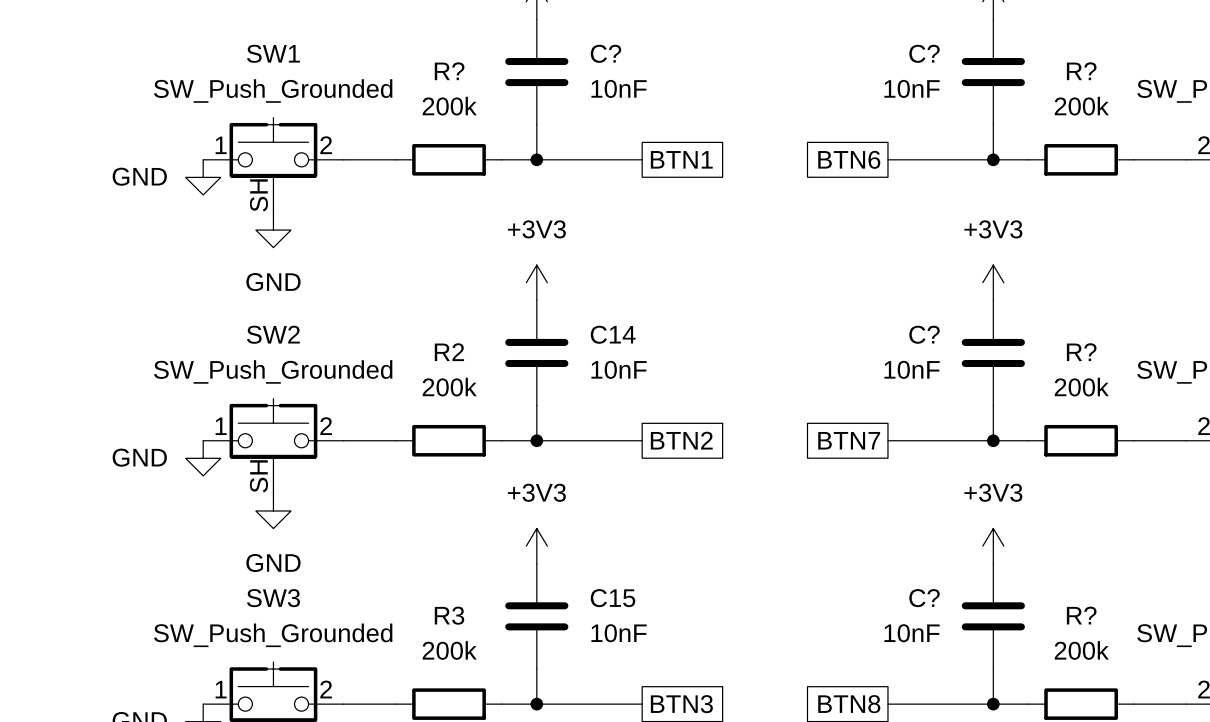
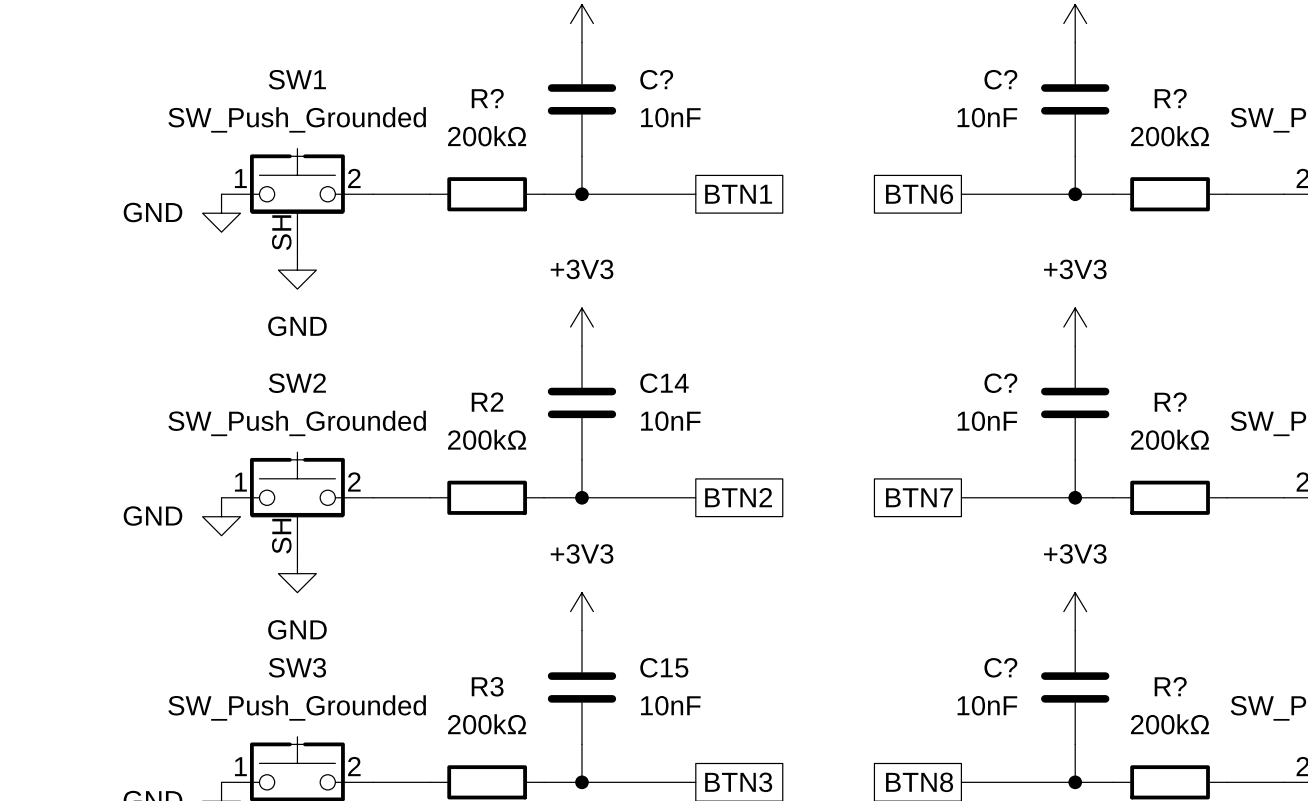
R? value: 200k (449, 106) -> 200kΩ (487, 136)
R? value: 200k (1081, 106) -> 200kΩ (1170, 136)
R2 value: 200k (449, 387) -> 200kΩ (487, 439)
R? value: 200k (1081, 387) -> 200kΩ (1170, 439)
R3 value: 200k (449, 650) -> 200kΩ (487, 724)
R? value: 200k (1081, 650) -> 200kΩ (1170, 724)

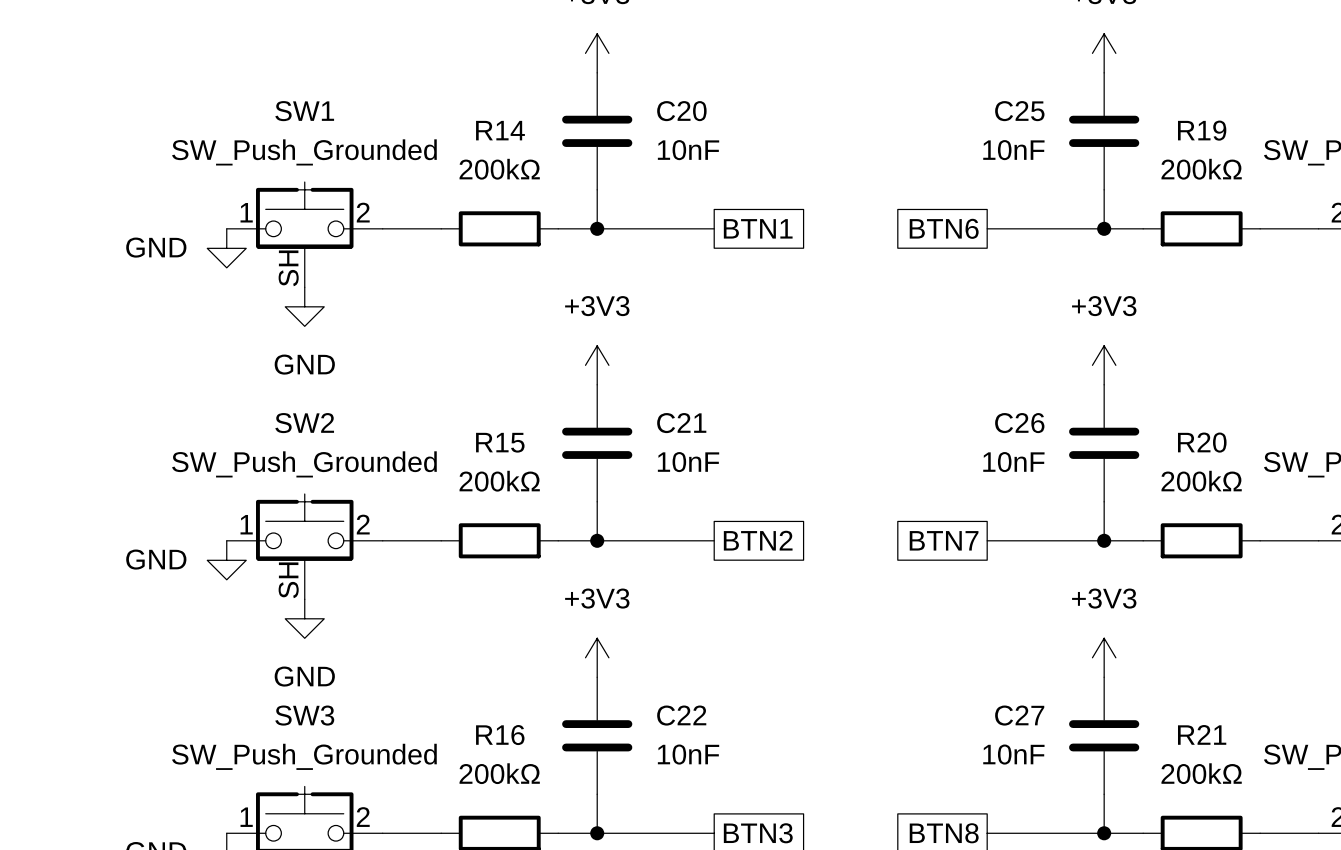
C? name: C? (656, 79) -> C20 (681, 111)
C? name: C? (1000, 79) -> C25 (1019, 111)
R? name: R? (487, 98) -> R14 (500, 130)
R? name: R? (1170, 98) -> R19 (1202, 130)
C14 name: C14 (664, 383) -> C21 (681, 423)
C? name: C? (1000, 383) -> C26 (1019, 423)
R2 name: R2 (487, 402) -> R15 (500, 442)
R? name: R? (1170, 402) -> R20 (1202, 442)
C15 name: C15 (664, 667) -> C22 (681, 715)
C? name: C? (1000, 667) -> C27 (1019, 715)
R3 name: R3 (487, 686) -> R16 (500, 735)
R? name: R? (1170, 686) -> R21 (1202, 734)

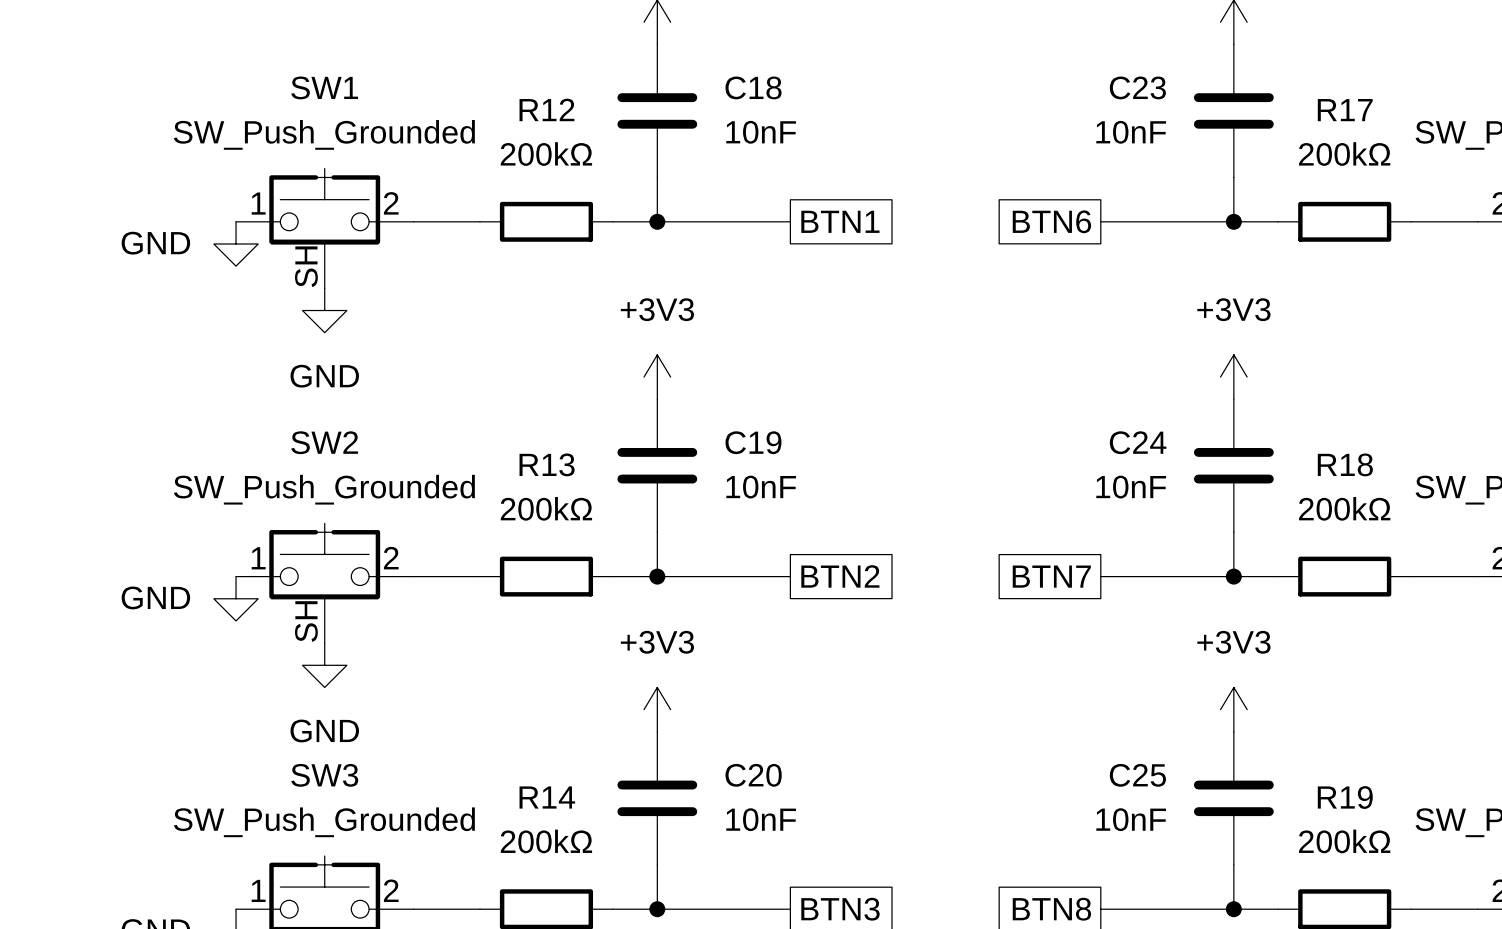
C20 name: C20 (681, 111) -> C18 (753, 87)
C25 name: C25 (1019, 111) -> C23 (1137, 87)
R14 name: R14 (500, 130) -> R12 (546, 109)
R19 name: R19 (1202, 130) -> R17 (1345, 110)
C21 name: C21 (681, 423) -> C19 (753, 442)
C26 name: C26 (1019, 423) -> C24 (1138, 442)
R15 name: R15 (500, 442) -> R13 (547, 464)
R20 name: R20 (1202, 442) -> R18 (1345, 464)
C22 name: C22 (681, 715) -> C20 (753, 775)
C27 name: C27 (1019, 715) -> C25 (1137, 775)
R21 name: R21 (1202, 734) -> R19 (1345, 797)
R16 name: R16 (500, 735) -> R14 (547, 797)

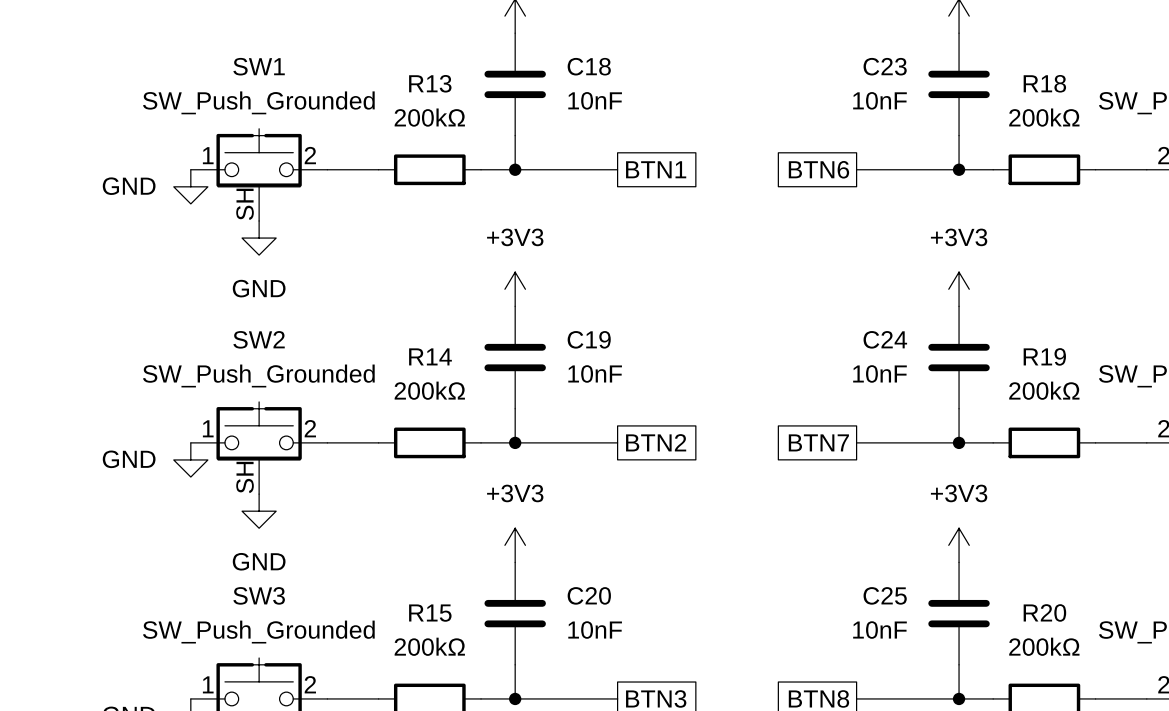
R12 name: R12 (546, 109) -> R13 (430, 83)
R17 name: R17 (1345, 110) -> R18 (1044, 83)
R13 name: R13 (547, 464) -> R14 (430, 356)
R18 name: R18 (1345, 464) -> R19 (1044, 356)
R14 name: R14 (547, 797) -> R15 (430, 613)
R19 name: R19 (1345, 797) -> R20 (1044, 612)

